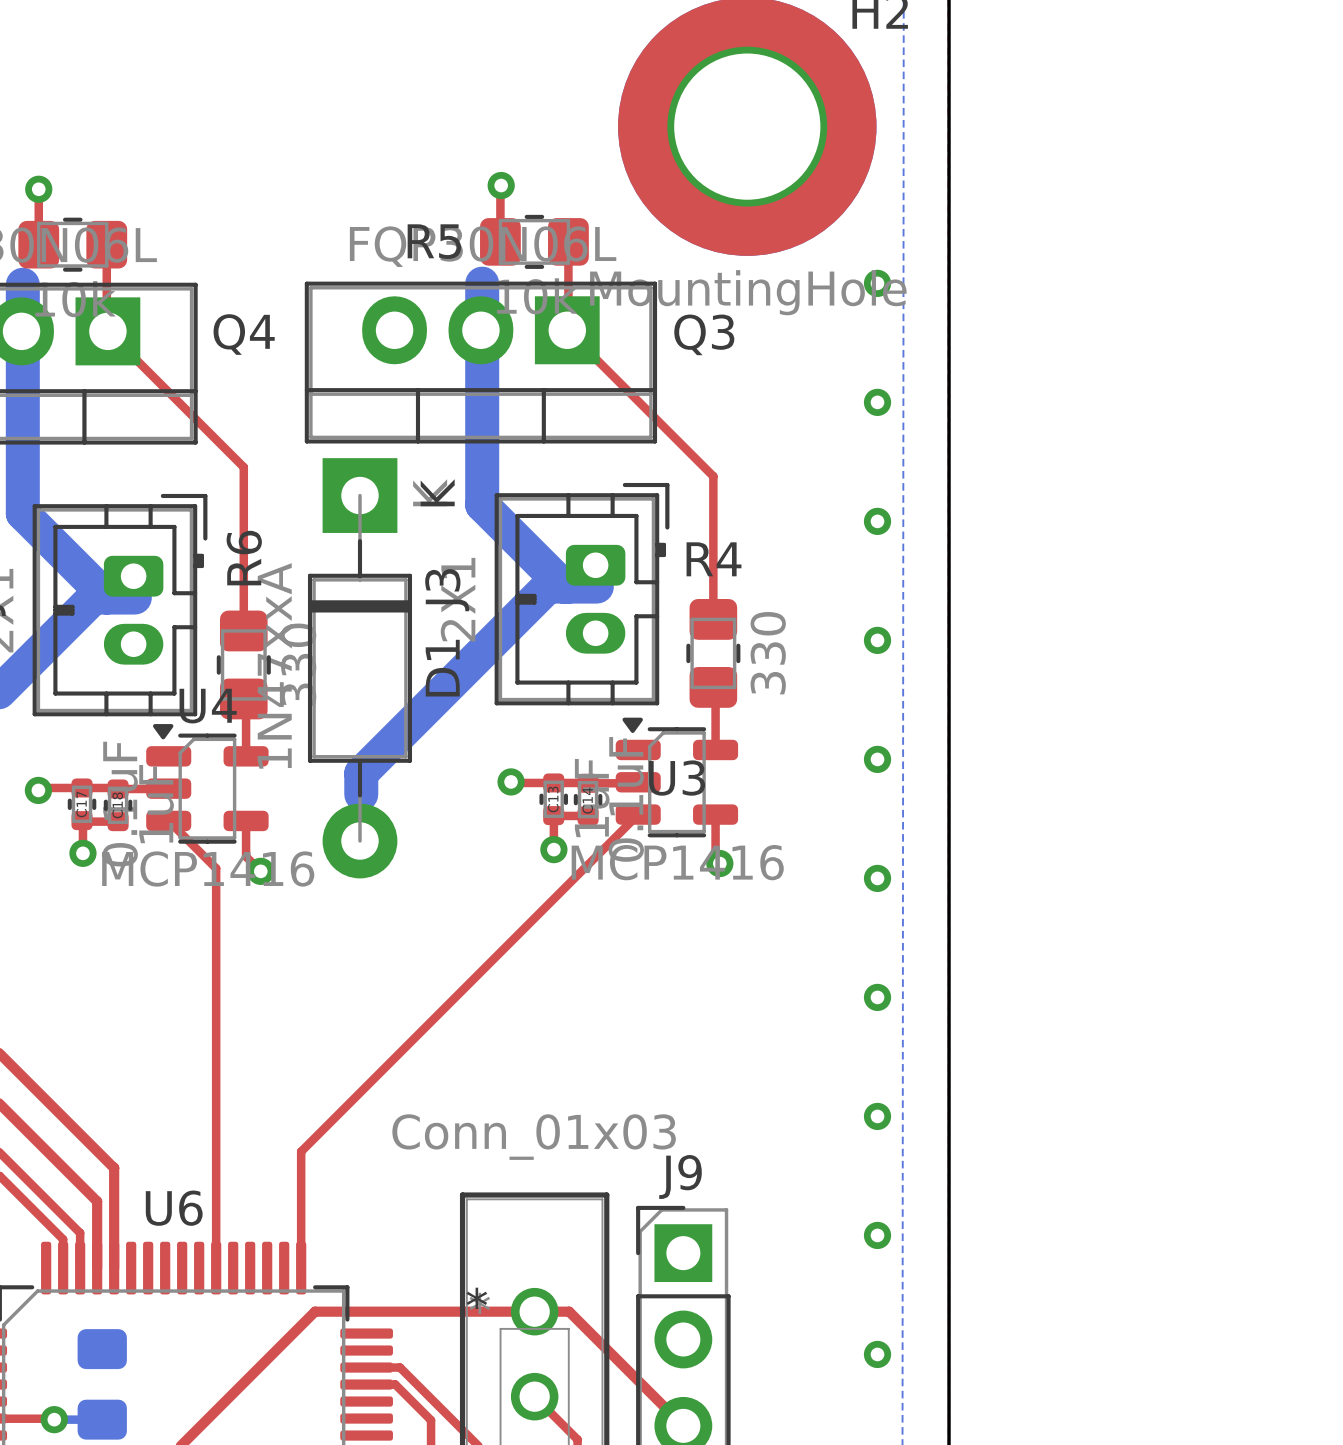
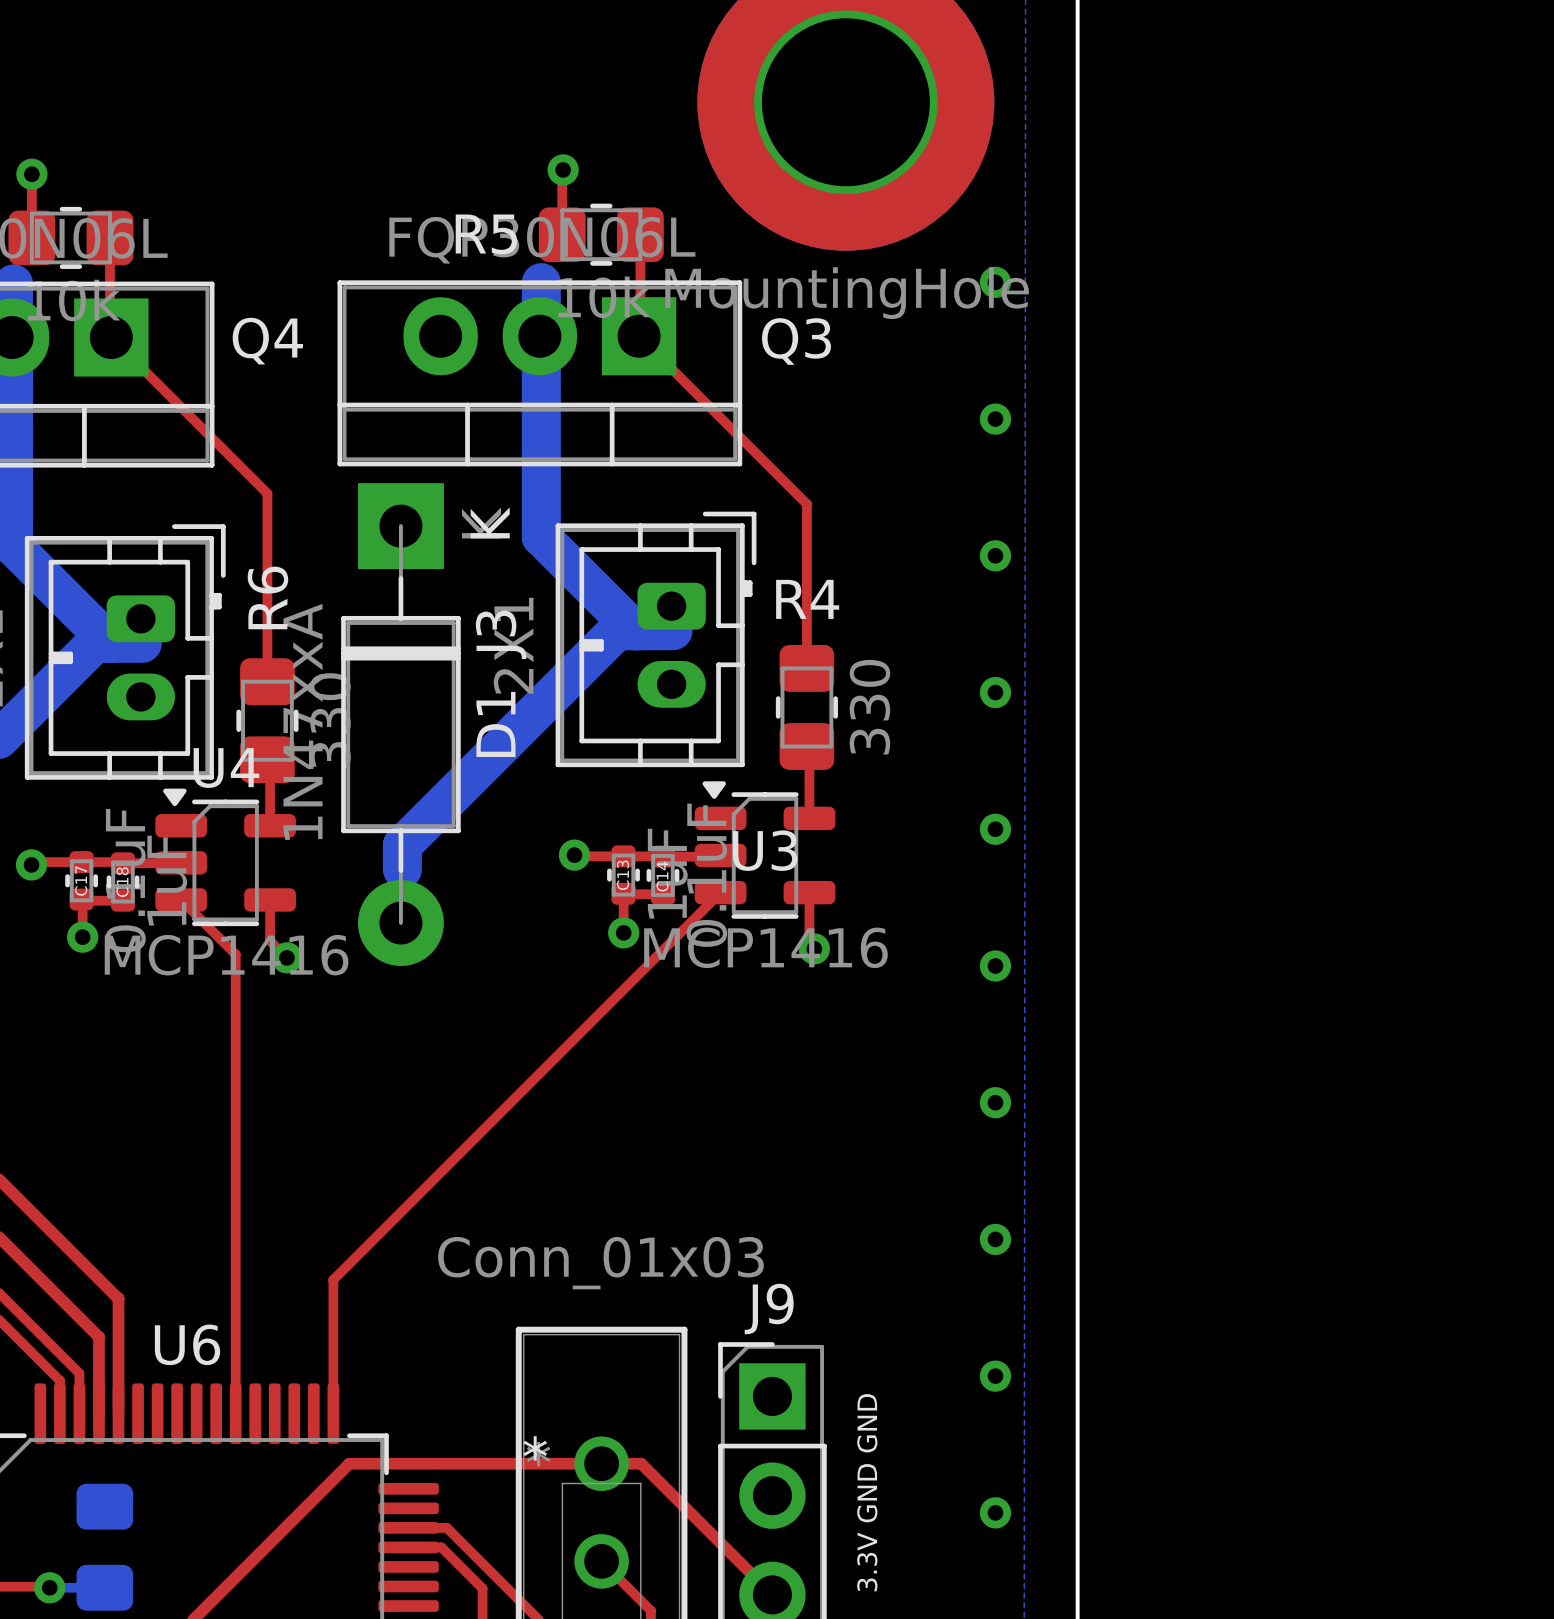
text: none -> 3.3V GND GND (867, 1492)

